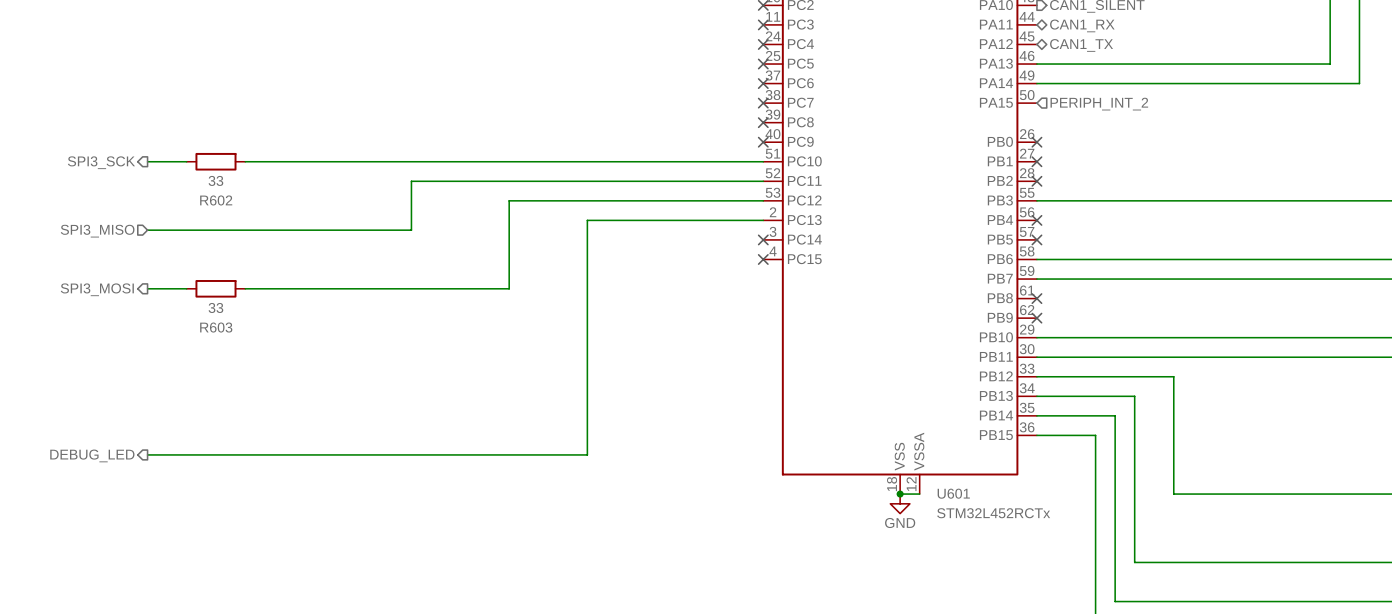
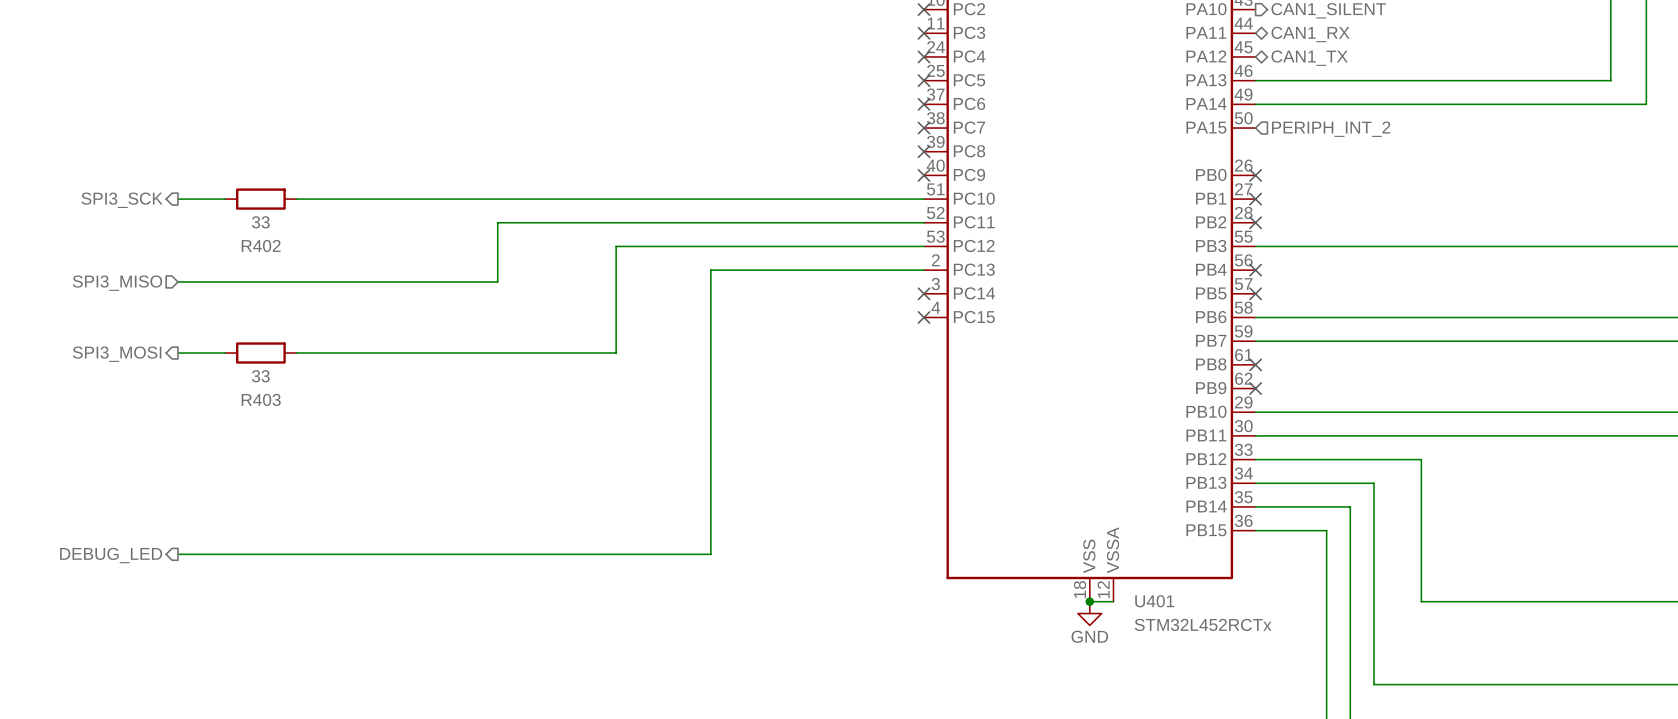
R602 name: R602 (216, 200) -> R402 (261, 246)
R603 name: R603 (216, 327) -> R403 (261, 399)
U601 name: U601 (953, 493) -> U401 (1154, 601)

